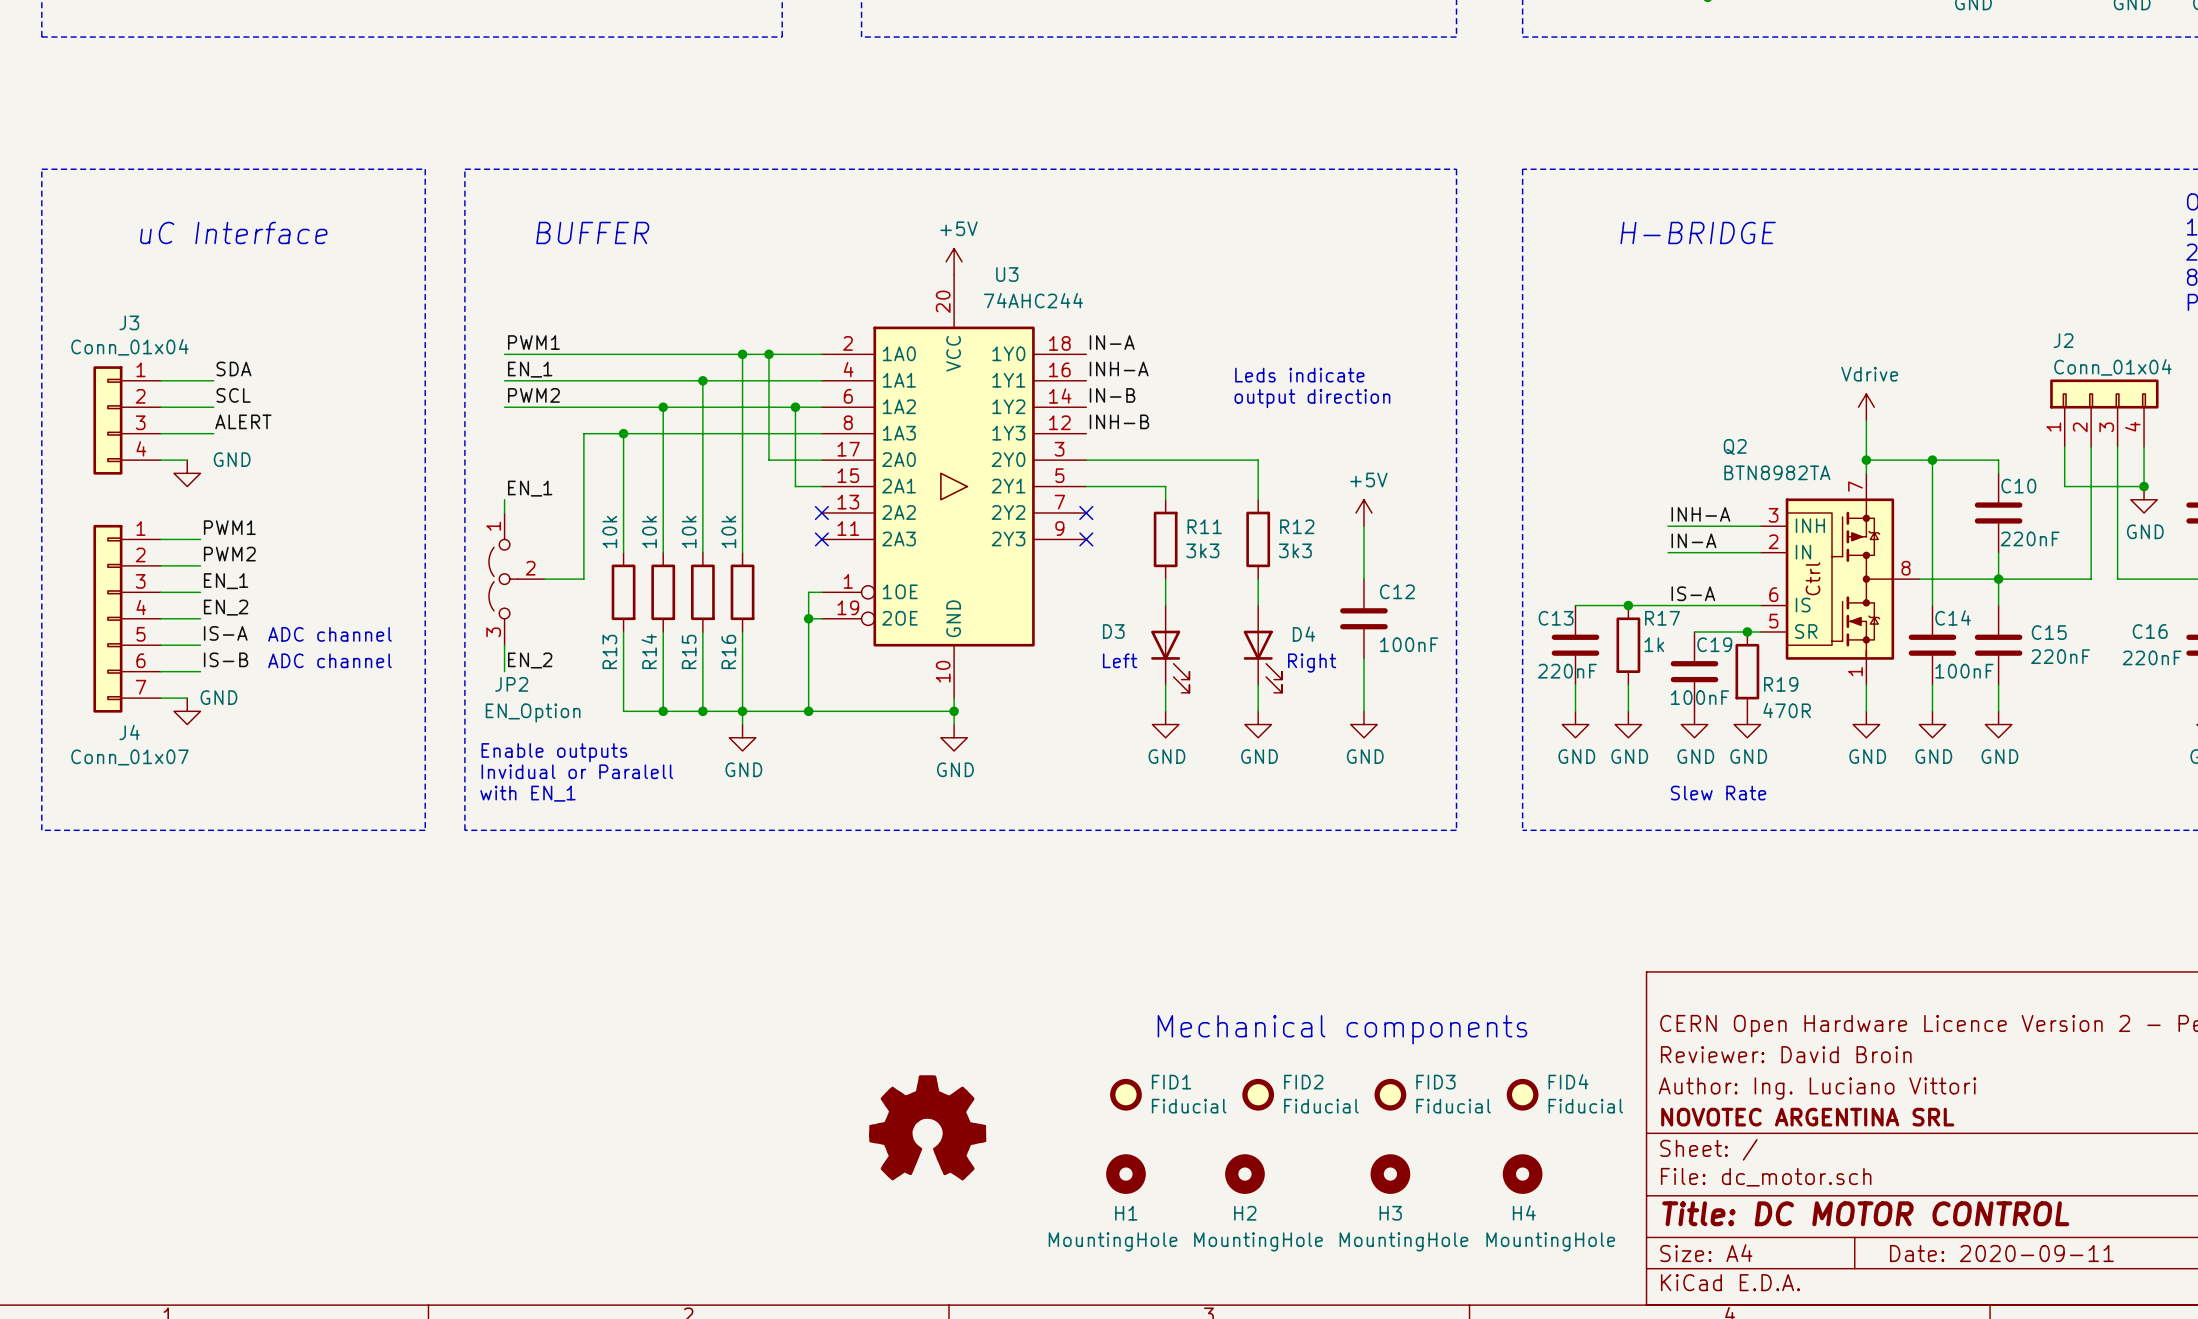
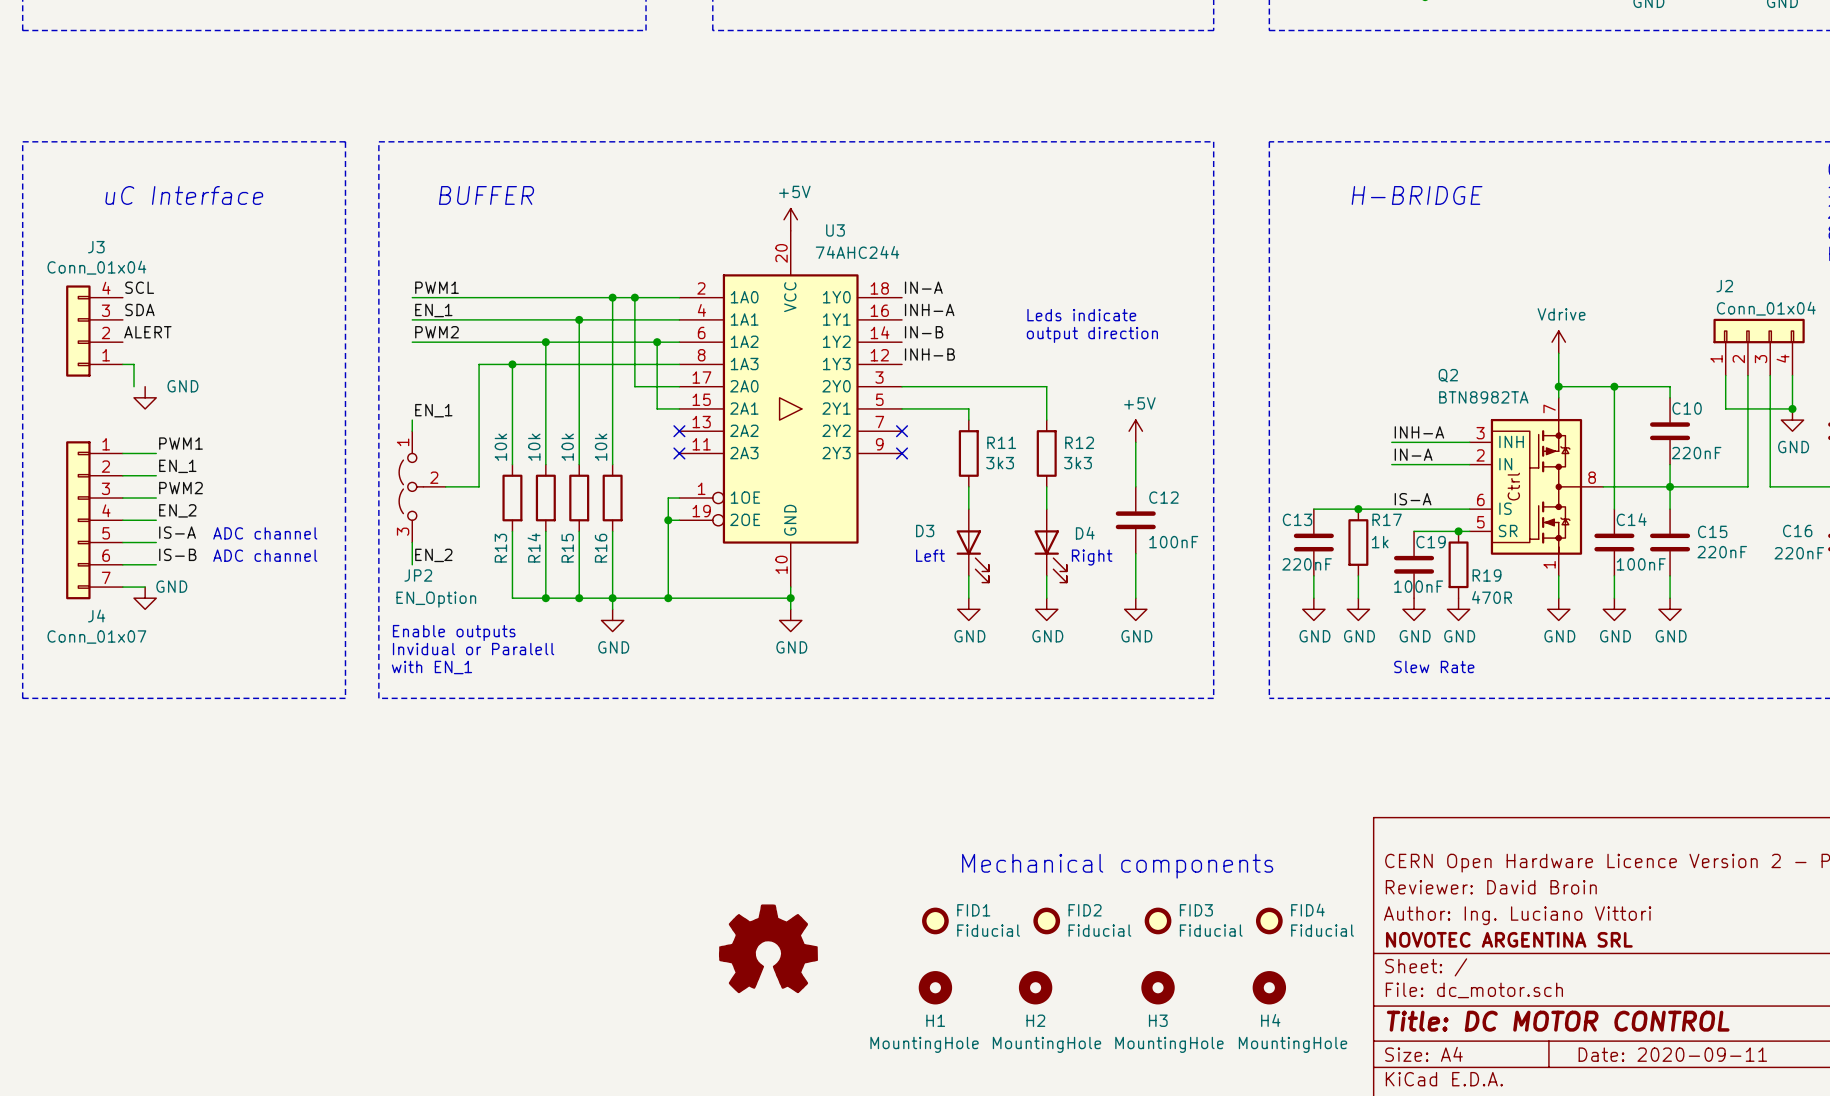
label position: SDA (233, 368) -> SDA (139, 309)
wire: (160, 380) (213, 380) -> none
label position: SCL (233, 395) -> SCL (139, 287)
wire: (160, 407) (213, 407) -> none
J3 flip: as is (107, 420) -> up-down (78, 331)
label position: ALERT (243, 421) -> ALERT (147, 332)
wire: (174, 433) (213, 433) -> (134, 364) (134, 386)
wire: (160, 460) (187, 460) -> none
label: PWM2 (229, 554) -> EN_1 (177, 466)
label: EN_1 (226, 581) -> PWM2 (180, 488)

